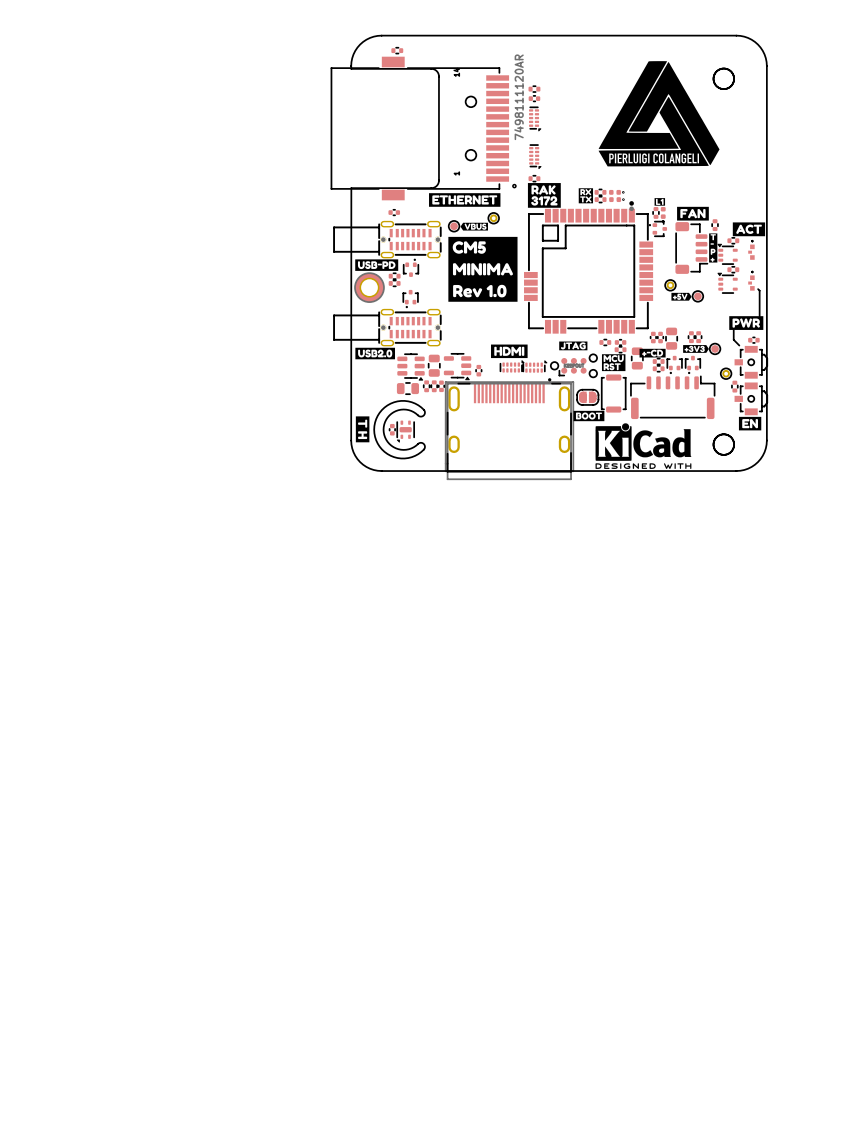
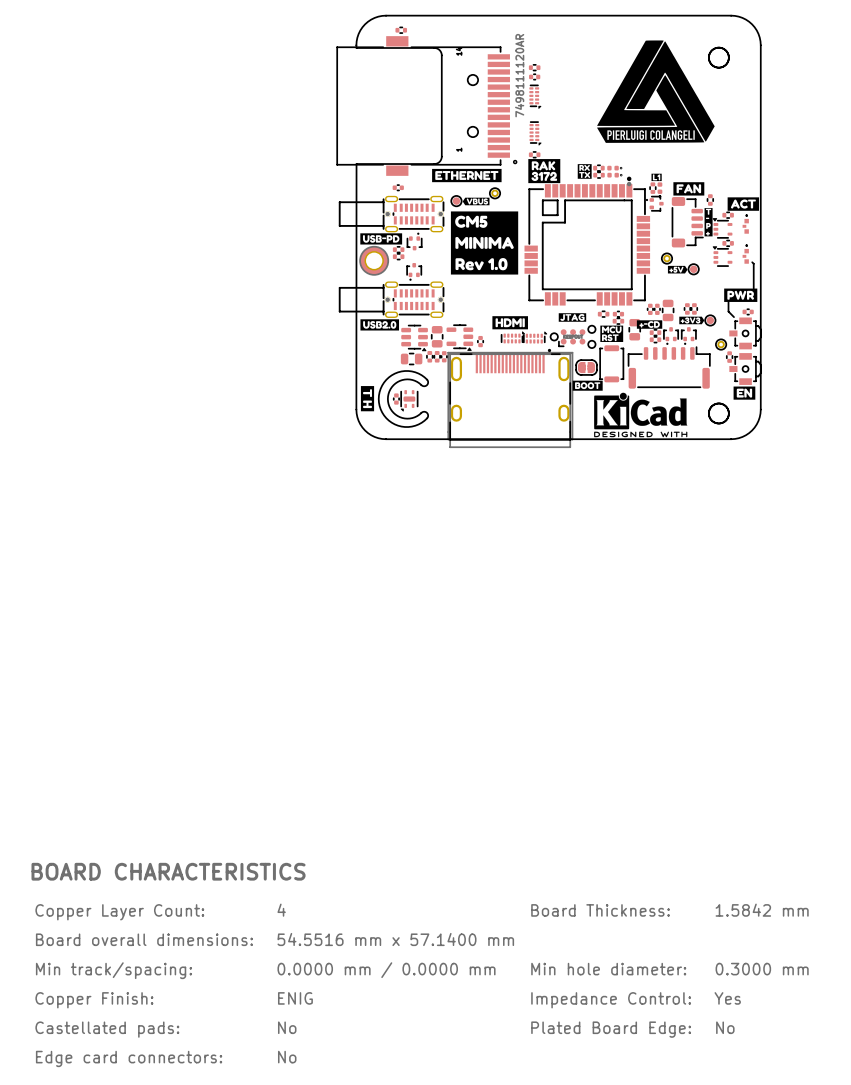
text: none -> BOARD CHARACTERISTICS (168, 871)
text: none -> 4 (281, 910)
text: none -> Board Thickness: (600, 910)
text: none -> 1.5842 mm (762, 910)
text: none -> Copper Layer Count: (119, 912)
text: none -> Board overall dimensions: (144, 939)
text: none -> 54.5516 mm x 57.1400 mm (395, 939)
text: none -> Min hole diameter: (608, 969)
text: none -> 0.3000 mm (762, 969)
text: none -> 0.0000 mm / 0.0000 mm (386, 970)
text: none -> Min track/spacing: (113, 970)
text: none -> ENIG (295, 998)
text: none -> Yes (727, 998)
text: none -> Copper Finish: (94, 1000)
text: none -> Impedance Control: (611, 1000)
text: none -> No (287, 1027)
text: none -> No (725, 1027)
text: none -> Castellated pads: (107, 1029)
text: none -> Plated Board Edge: (611, 1029)
text: none -> No (287, 1057)
text: none -> Edge card connectors: (129, 1058)

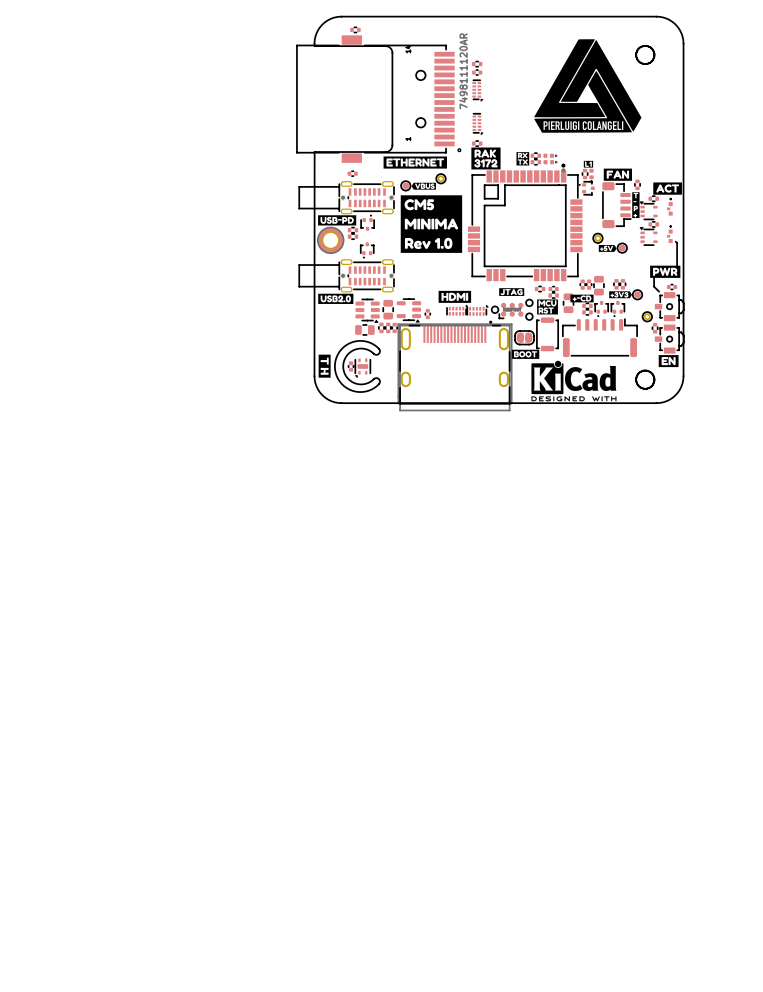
text: BOARD CHARACTERISTICS (168, 871) -> none
text: 4 (281, 910) -> none
text: Board Thickness: (600, 910) -> none
text: 1.5842 mm (762, 910) -> none
text: Copper Layer Count: (119, 912) -> none
text: Board overall dimensions: (144, 939) -> none
text: 54.5516 mm x 57.1400 mm (395, 939) -> none
text: Min hole diameter: (608, 969) -> none
text: 0.3000 mm (762, 969) -> none
text: Min track/spacing: (113, 970) -> none
text: 0.0000 mm / 0.0000 mm (386, 970) -> none
text: ENIG (295, 998) -> none
text: Yes (727, 998) -> none
text: Copper Finish: (94, 1000) -> none
text: Impedance Control: (611, 1000) -> none
text: No (287, 1027) -> none
text: No (725, 1027) -> none
text: Castellated pads: (107, 1029) -> none
text: Plated Board Edge: (611, 1029) -> none
text: No (287, 1057) -> none
text: Edge card connectors: (129, 1058) -> none

